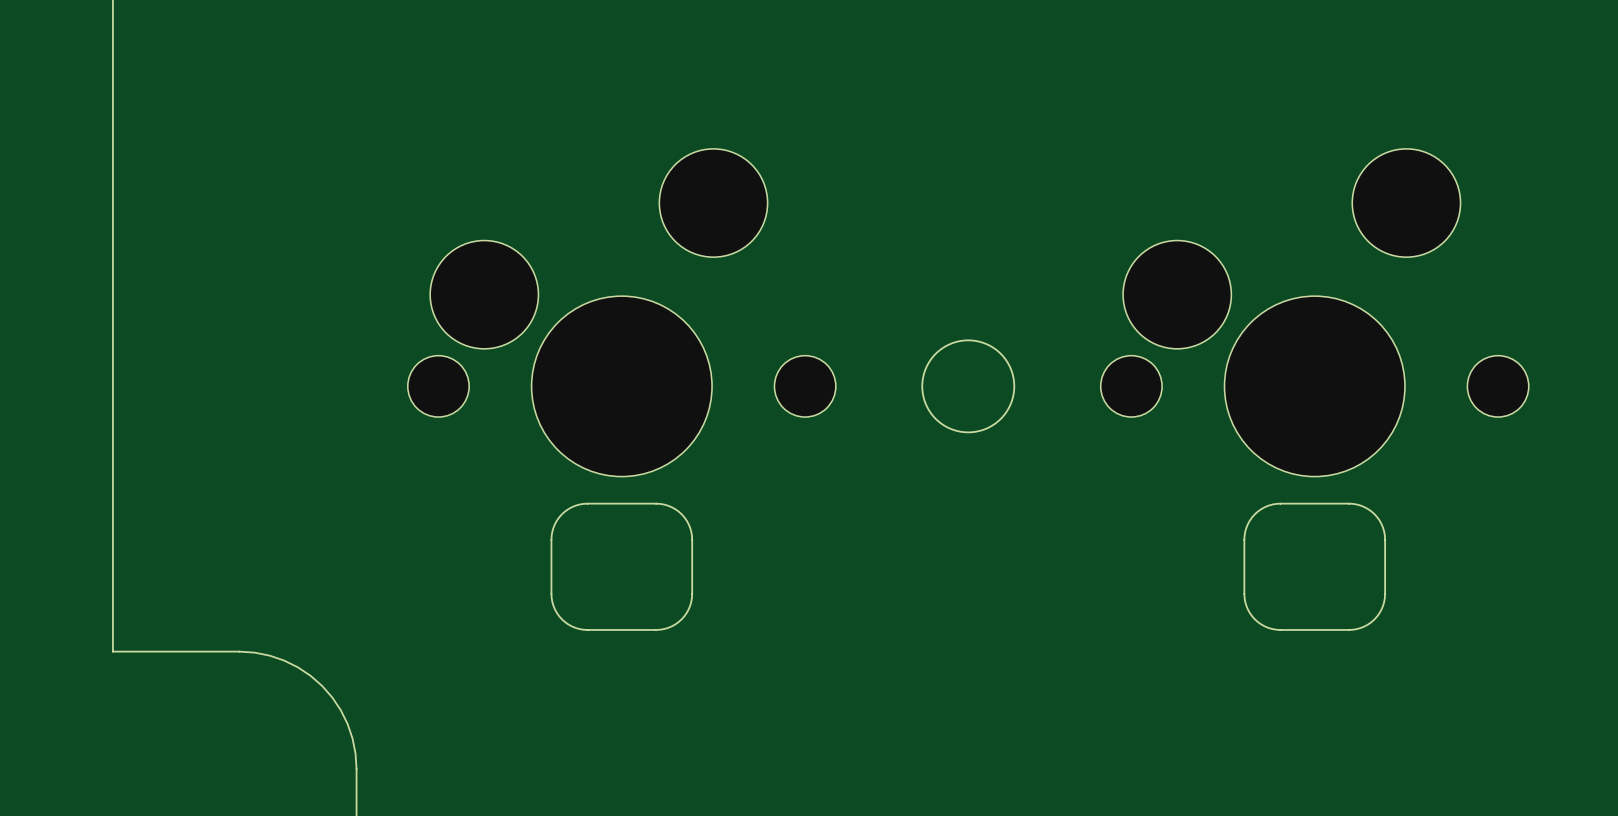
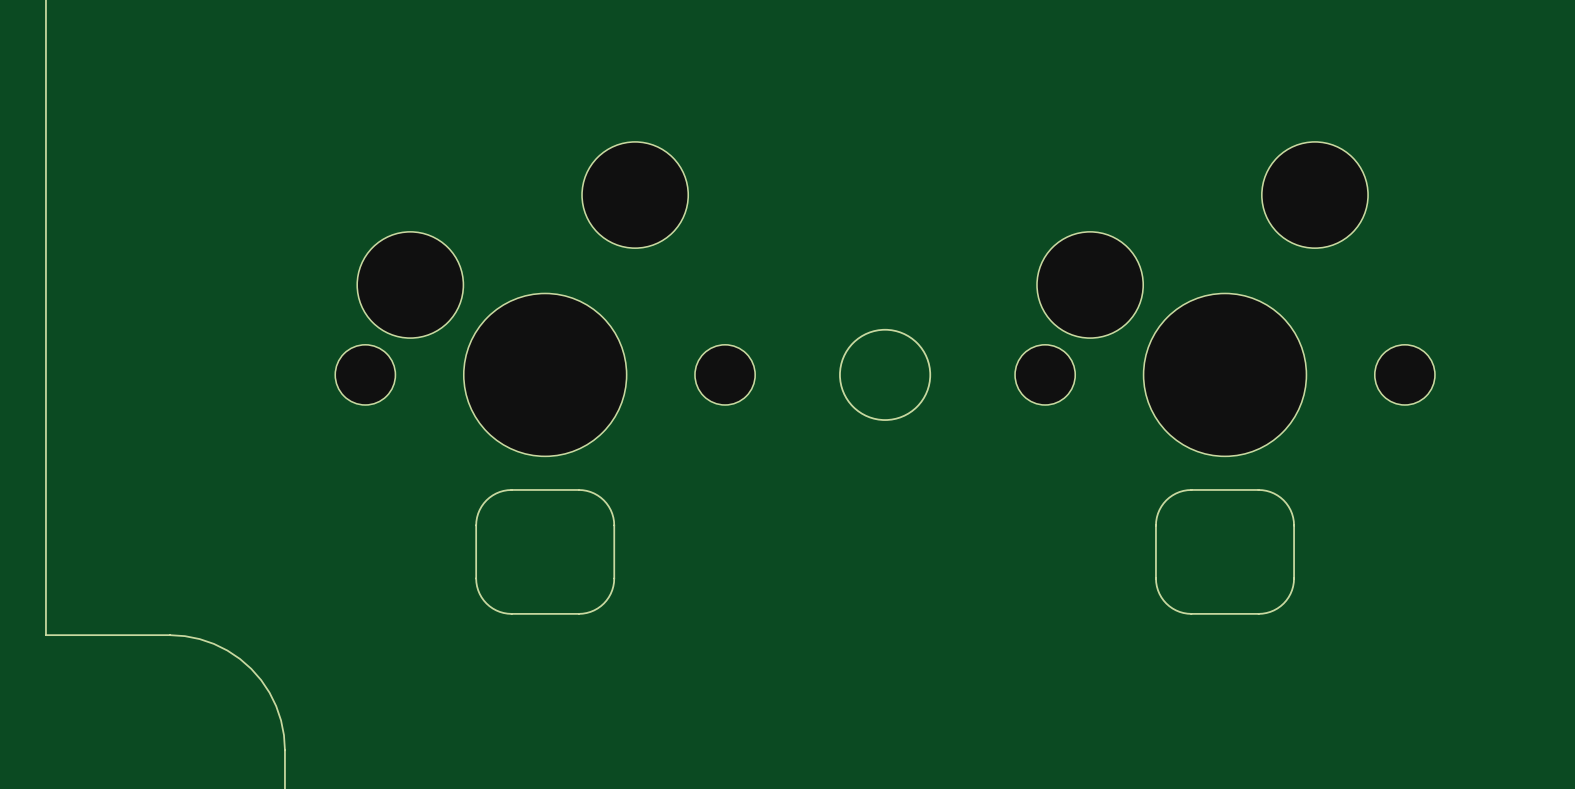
part footprint: [407, 148, 836, 477] -> [335, 141, 756, 457]
part footprint: [1100, 148, 1529, 477] -> [1015, 141, 1435, 457]

